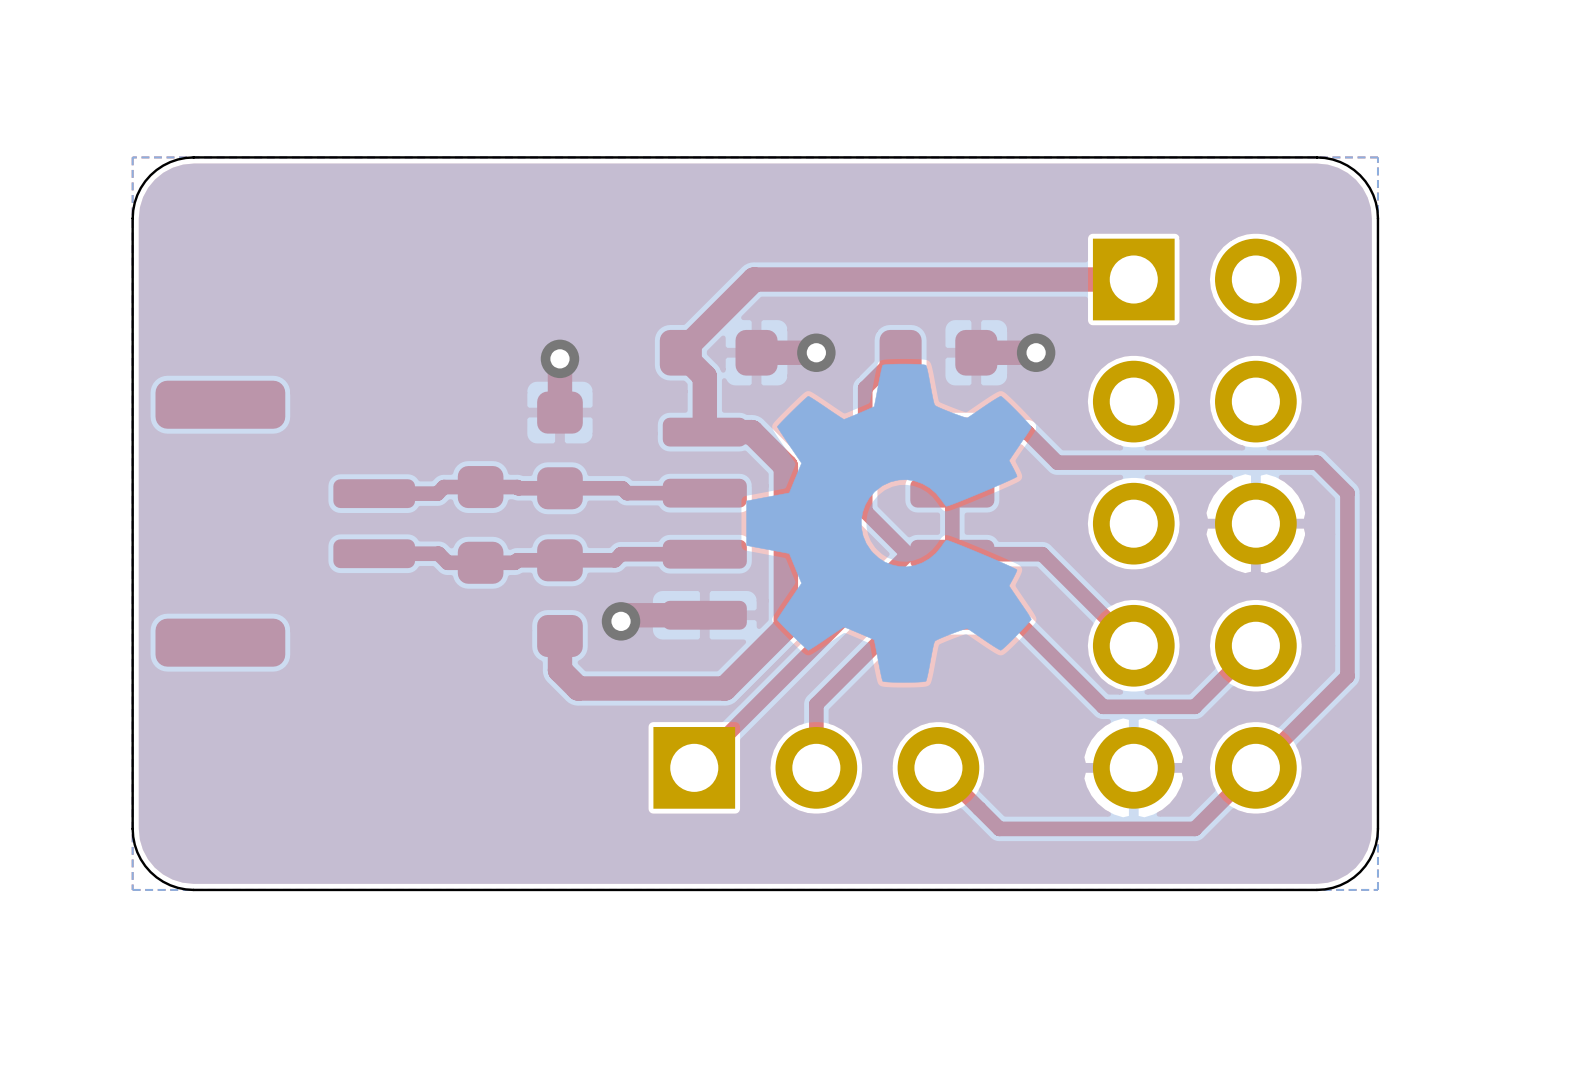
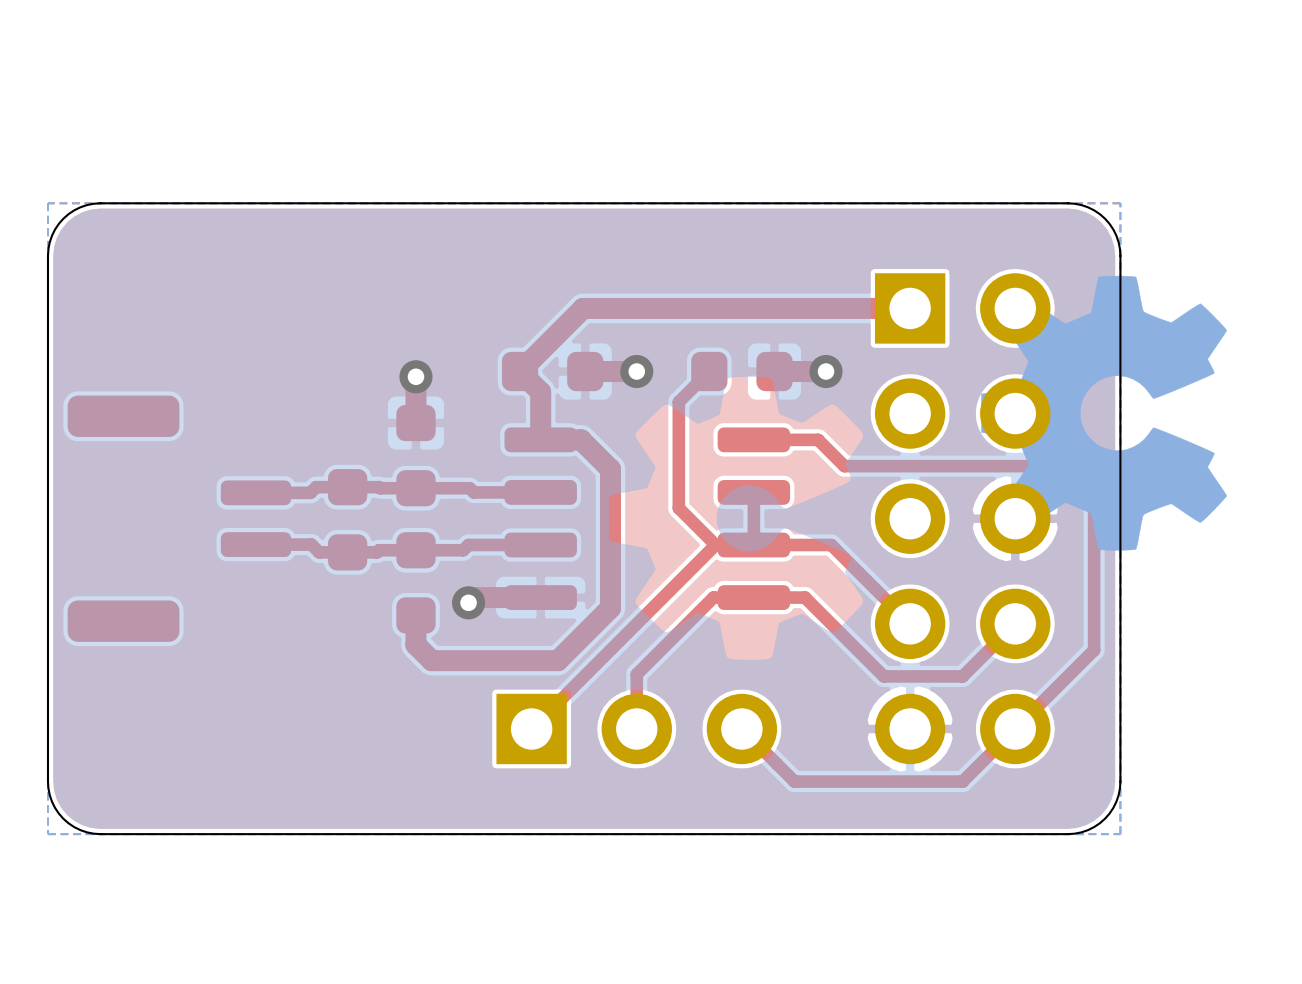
drawing position: (888, 523) -> (1104, 413)

